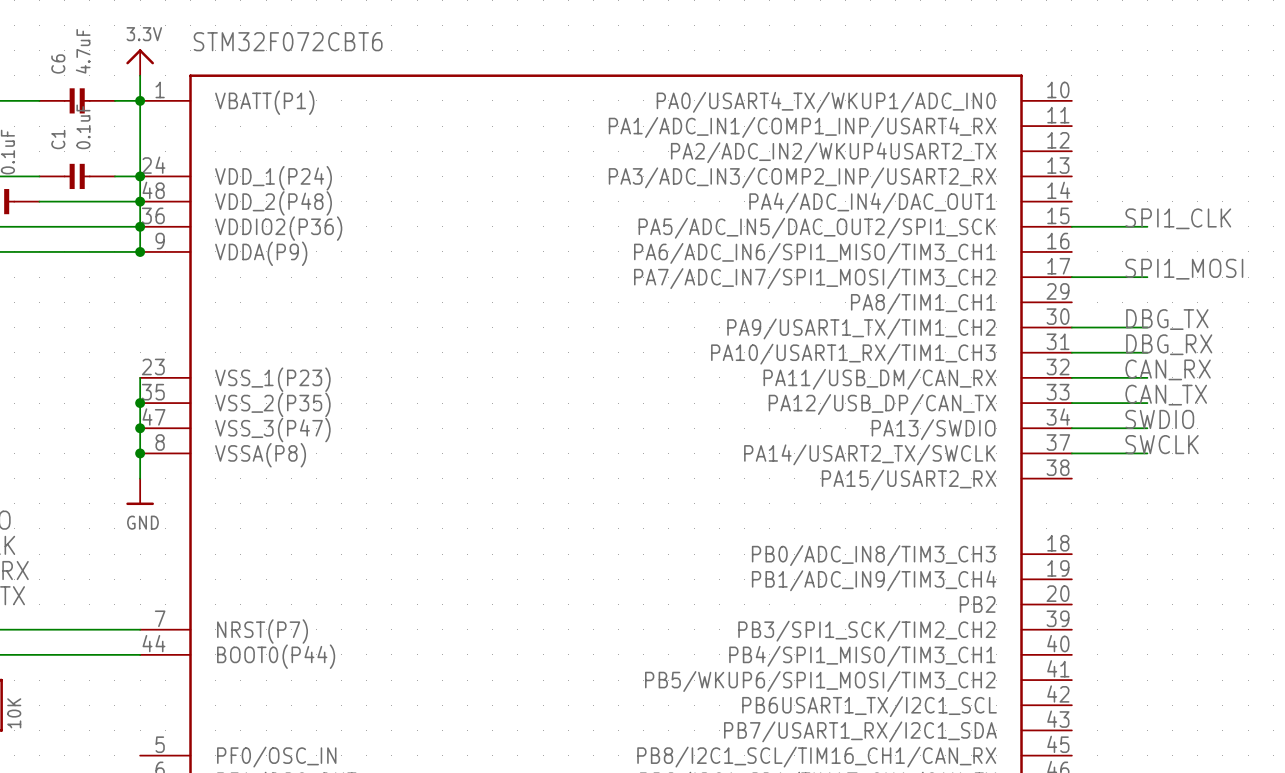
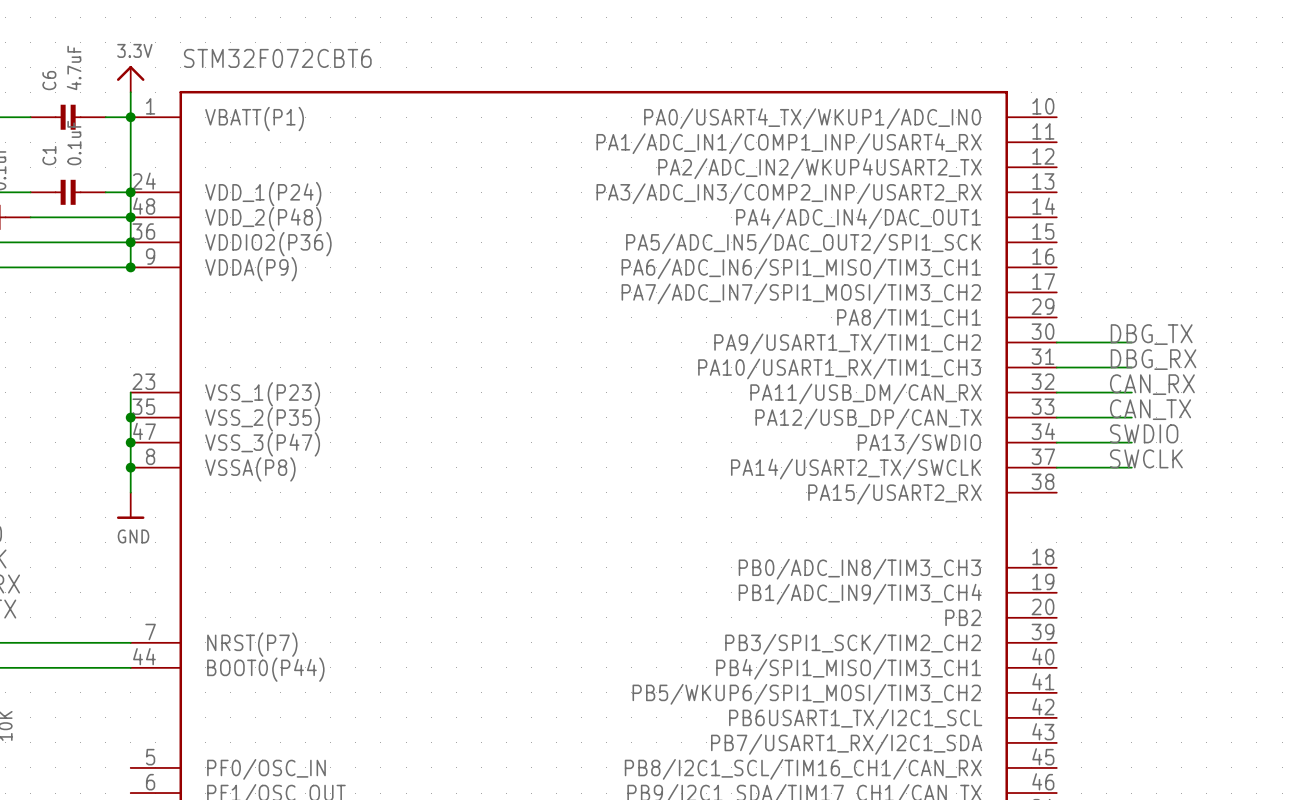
label: SPI1_CLK (1178, 218) -> none
wire: (1071, 226) (1147, 226) -> none
label: SPI1_MOSI (1184, 269) -> none
wire: (1071, 277) (1147, 277) -> none

